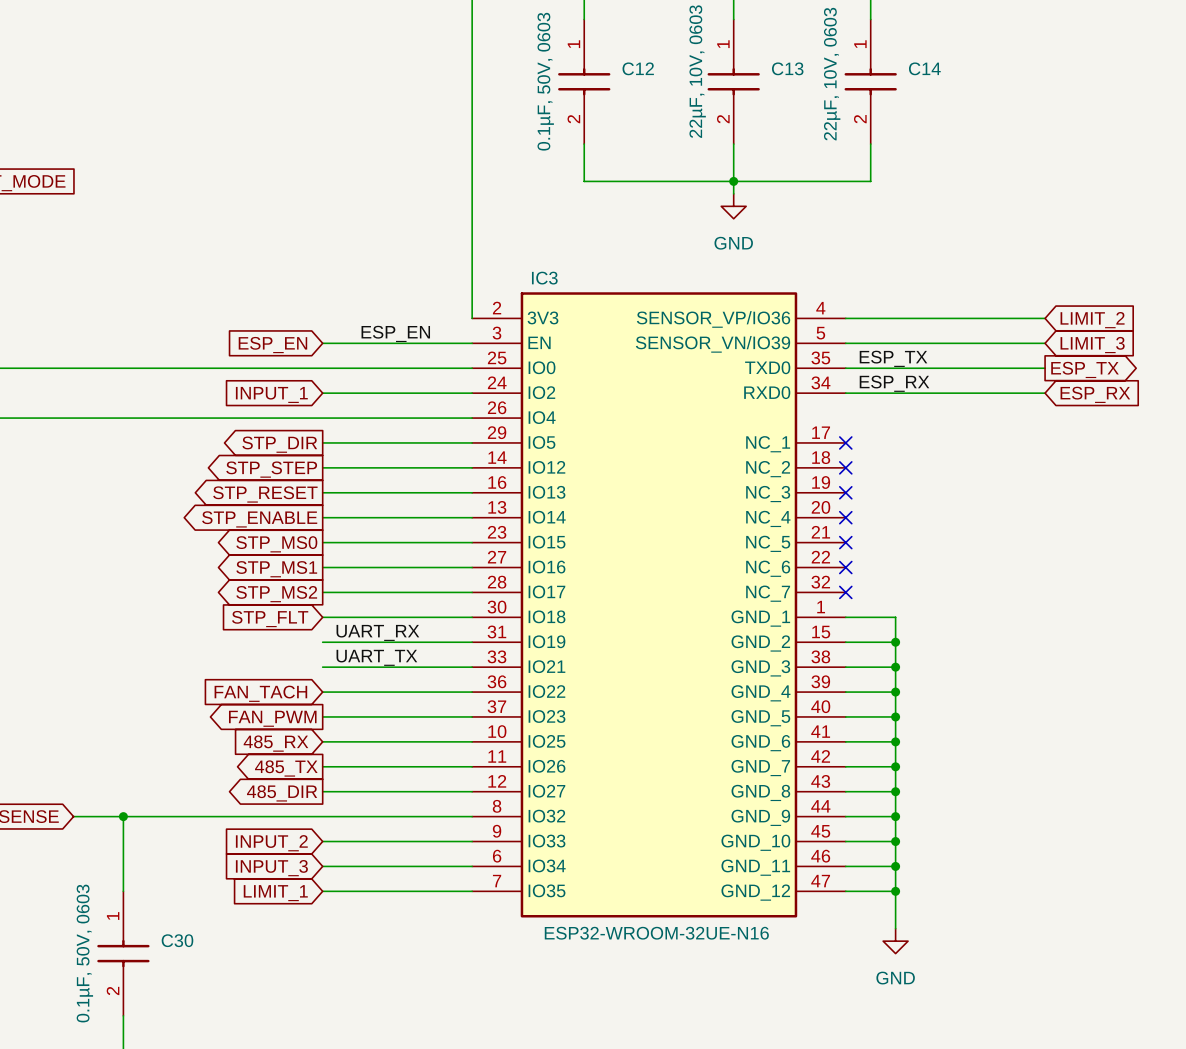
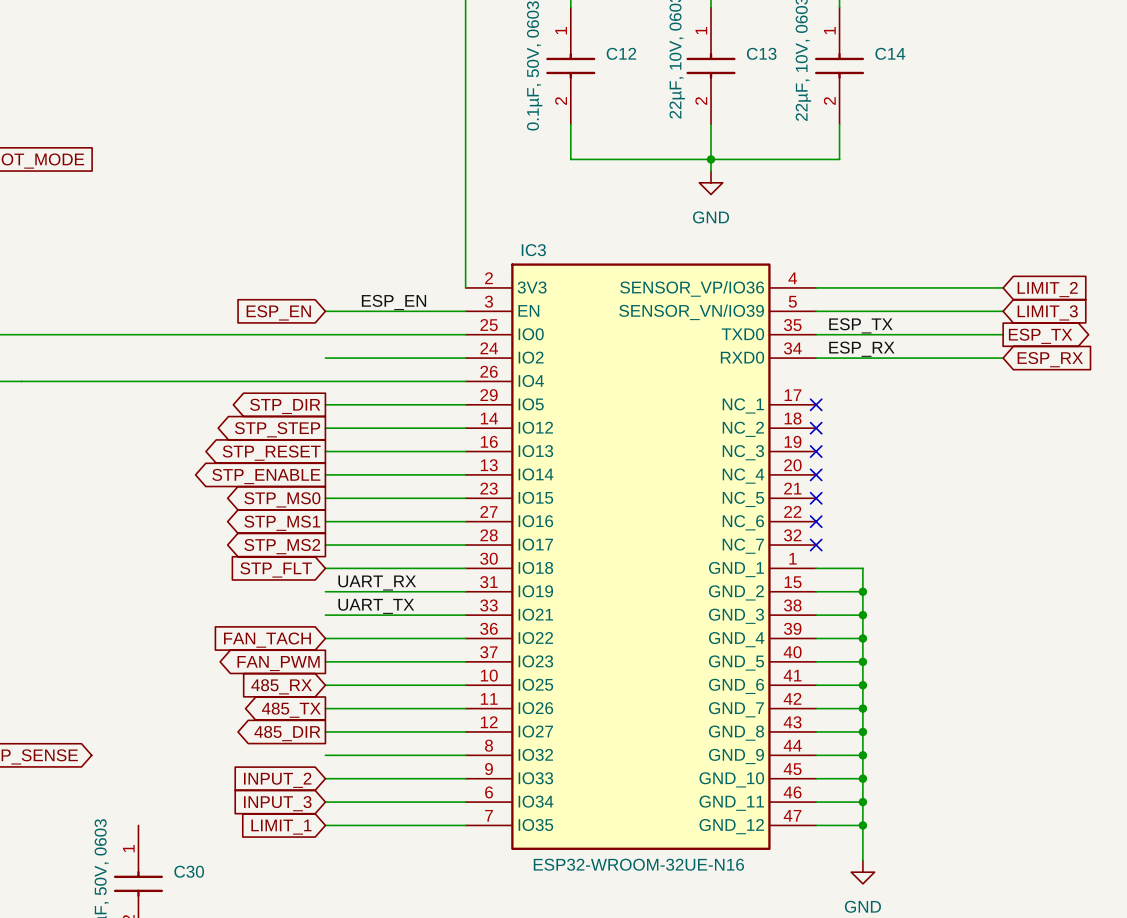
global label: INPUT_1 (271, 394) -> none
wire: (73, 816) (322, 816) -> none
wire: (123, 816) (123, 891) -> none
junction: (123, 816) -> none

